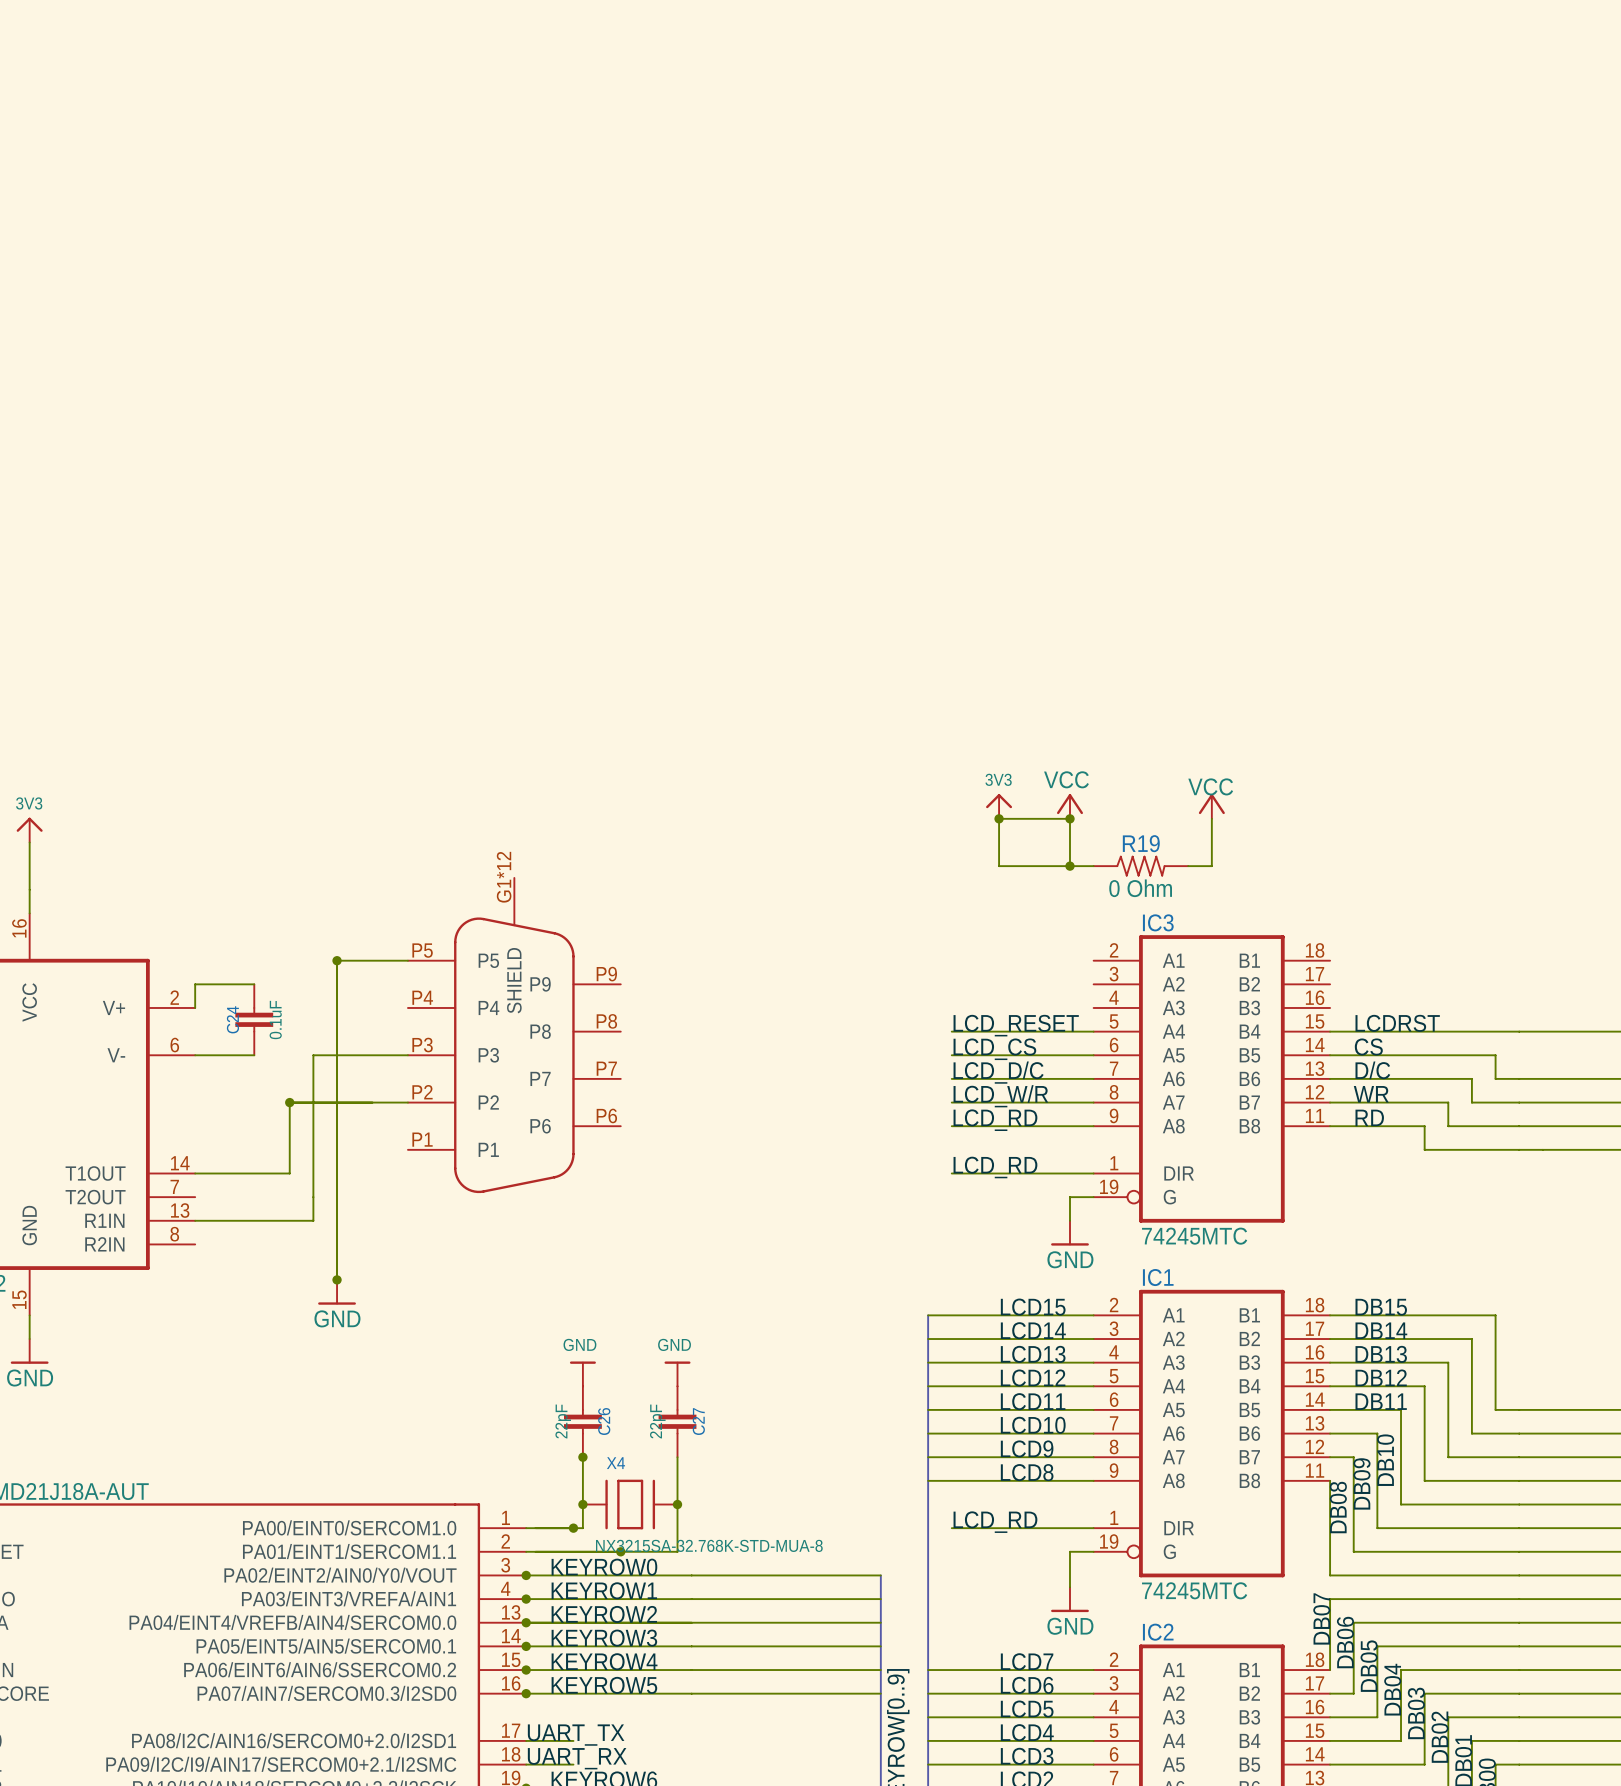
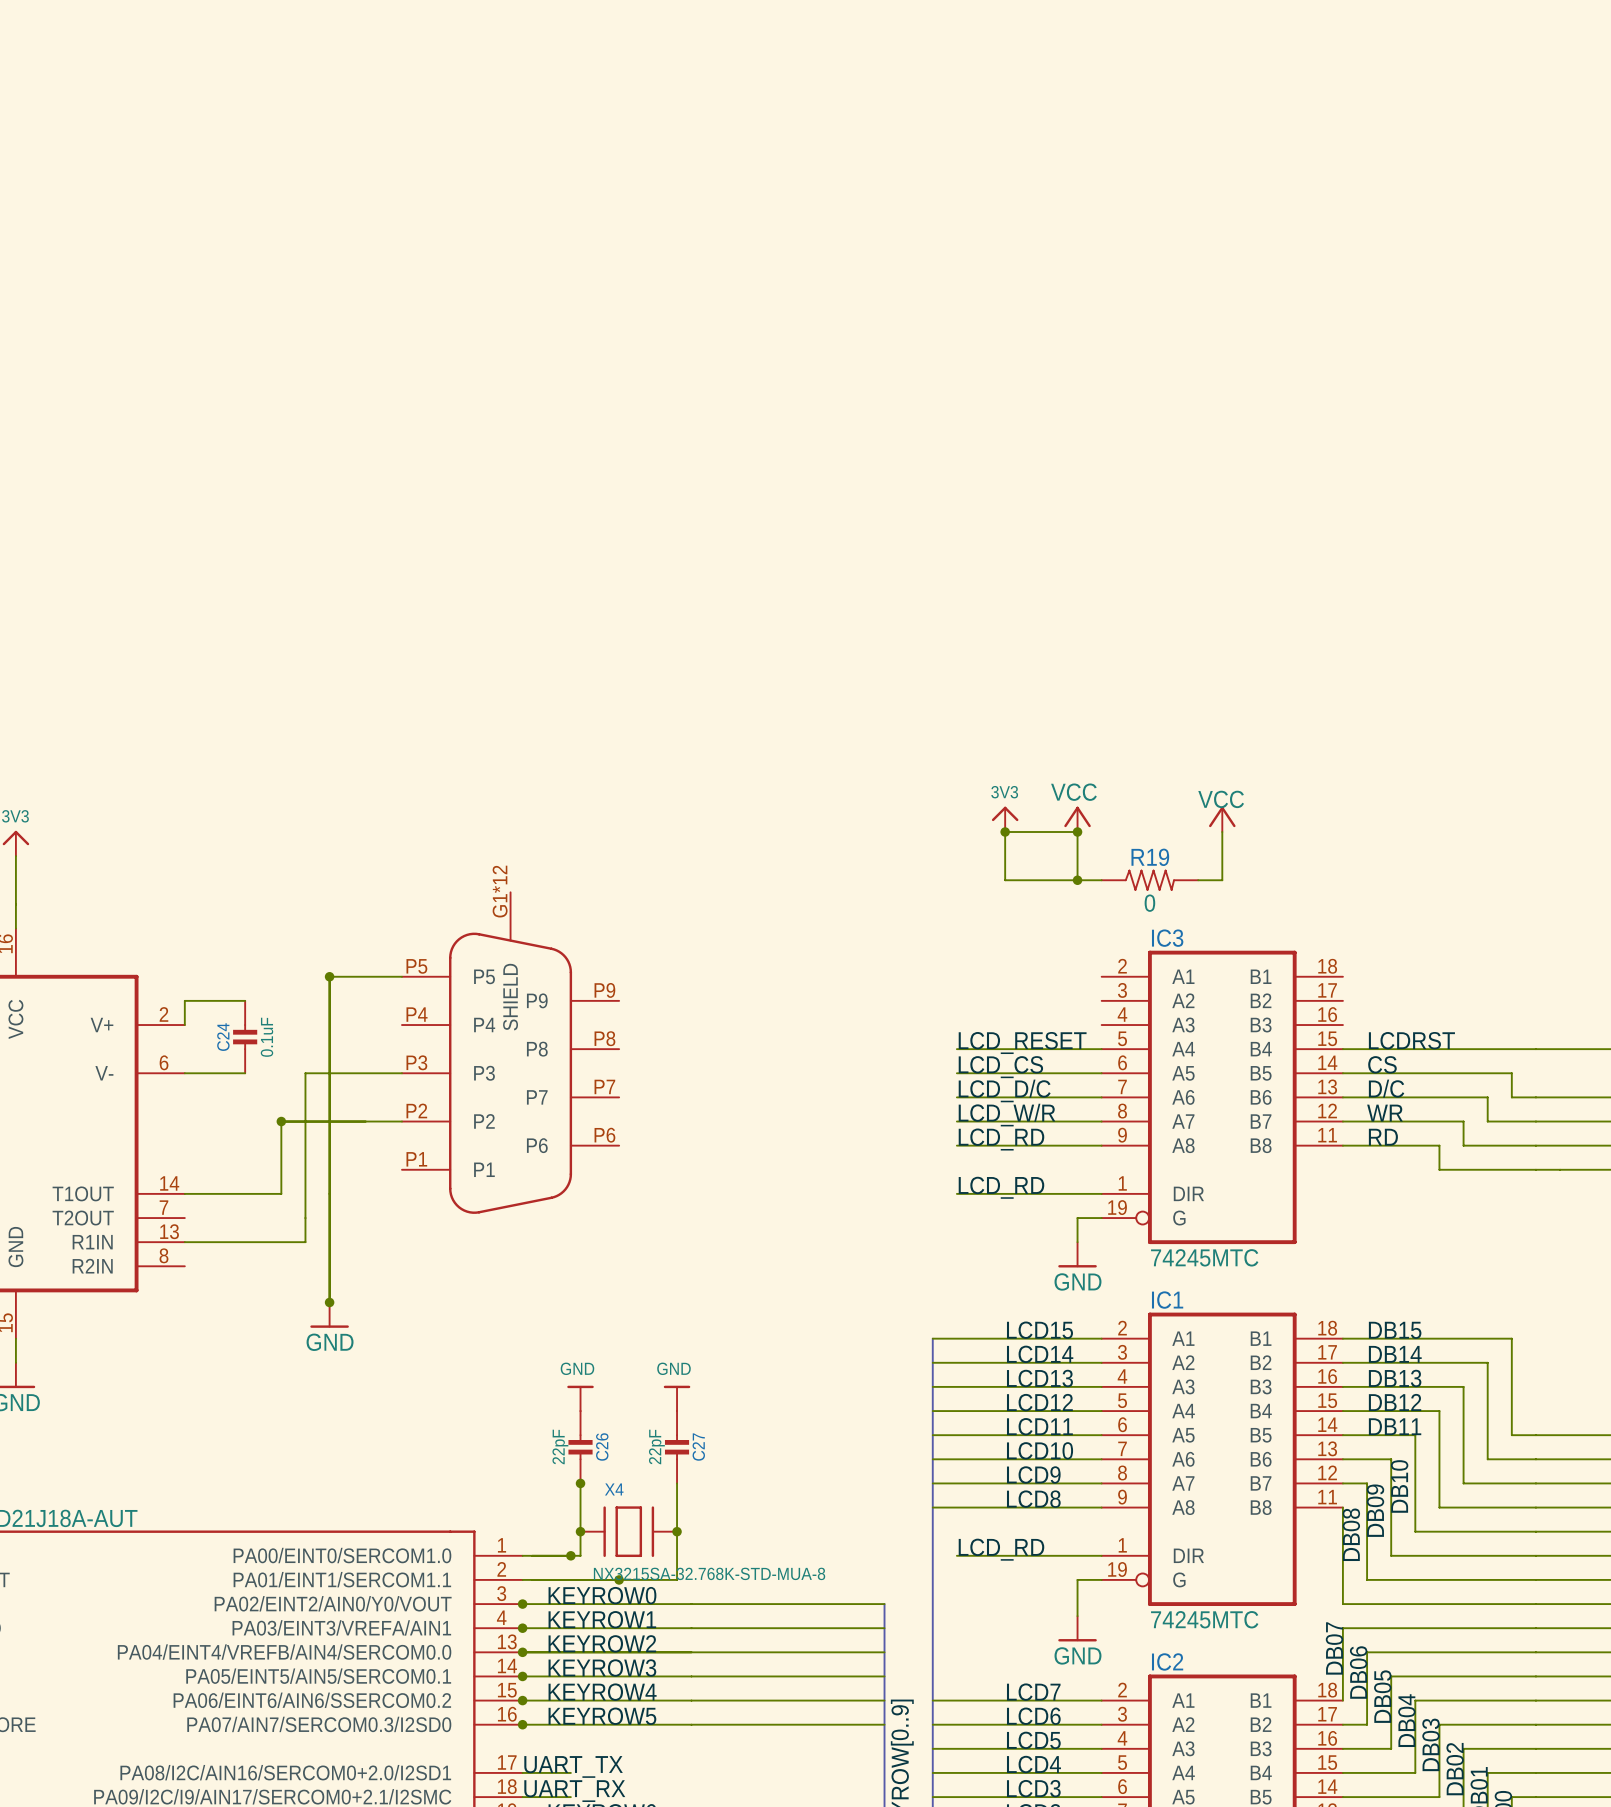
R19 value: 0 Ohm (1140, 888) -> 0 (1149, 903)
C24 symbol: [235, 984, 274, 1056] -> [233, 1000, 258, 1074]
C26 symbol: [564, 1386, 602, 1458] -> [568, 1411, 593, 1484]
C27 symbol: [658, 1386, 697, 1458] -> [664, 1411, 690, 1484]

